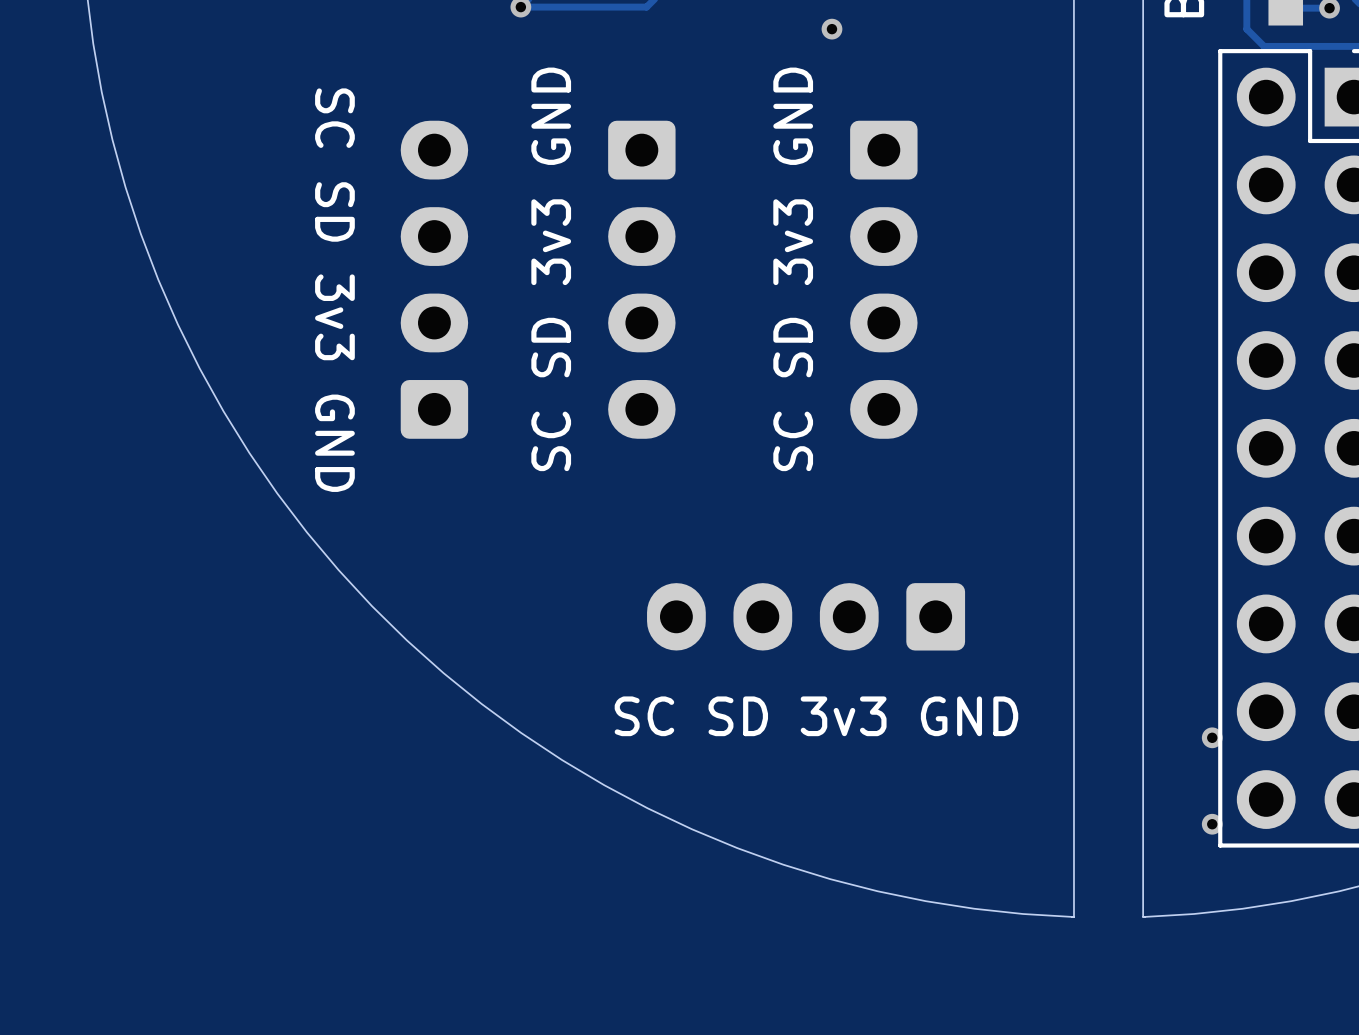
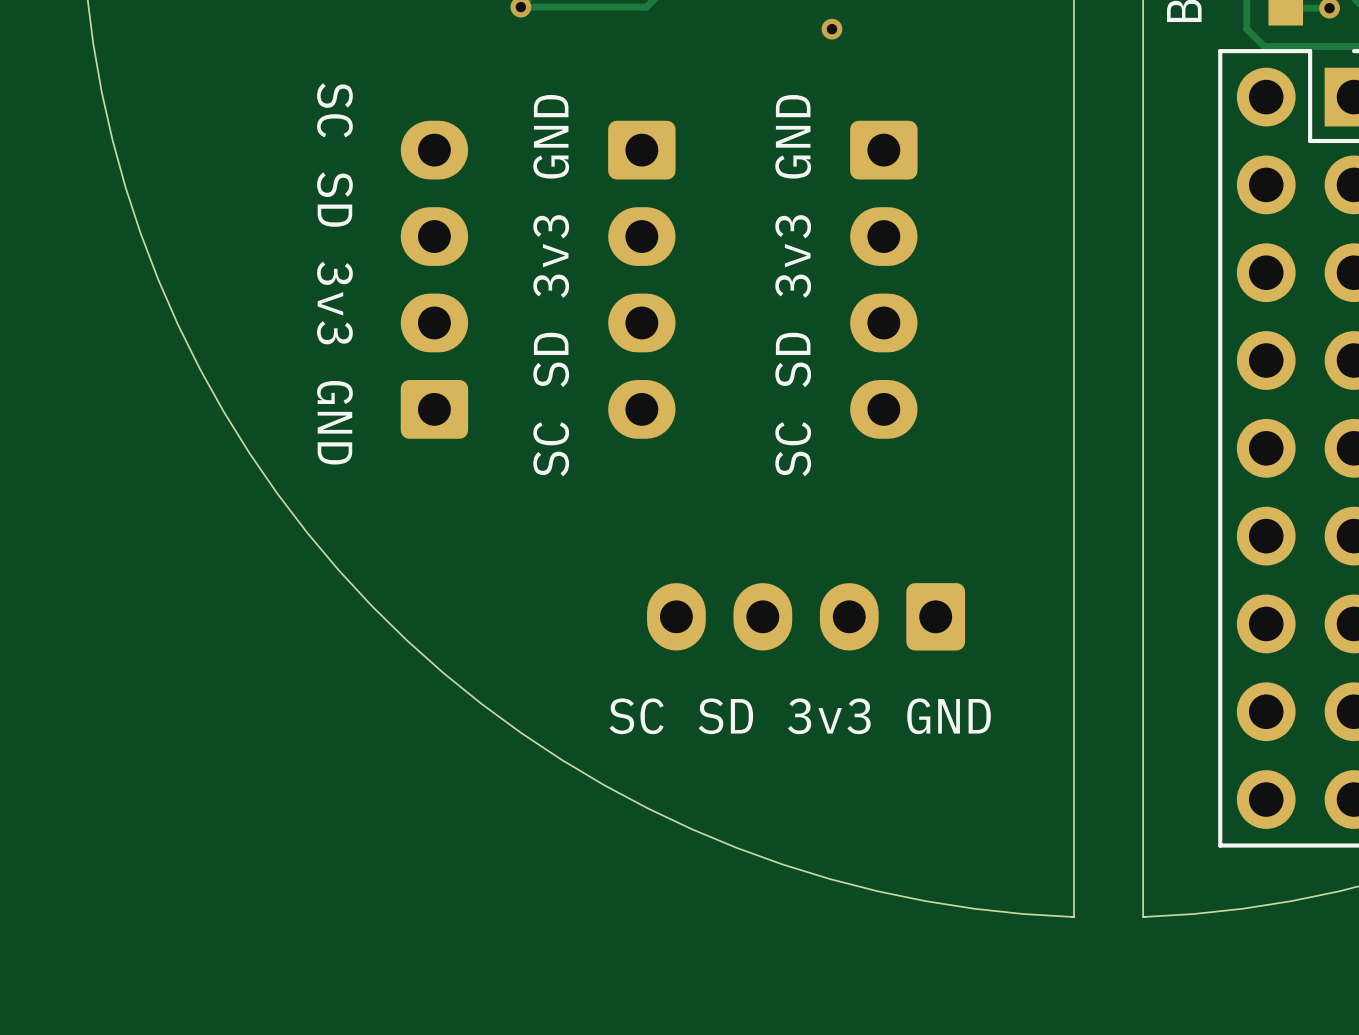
via: (1212, 737) -> none
via: (1212, 824) -> none

